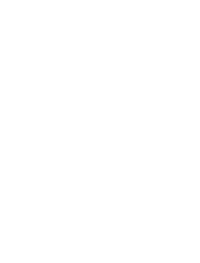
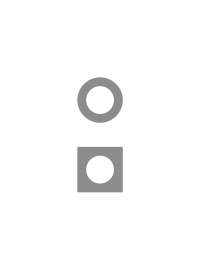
part: none -> (100, 134)

